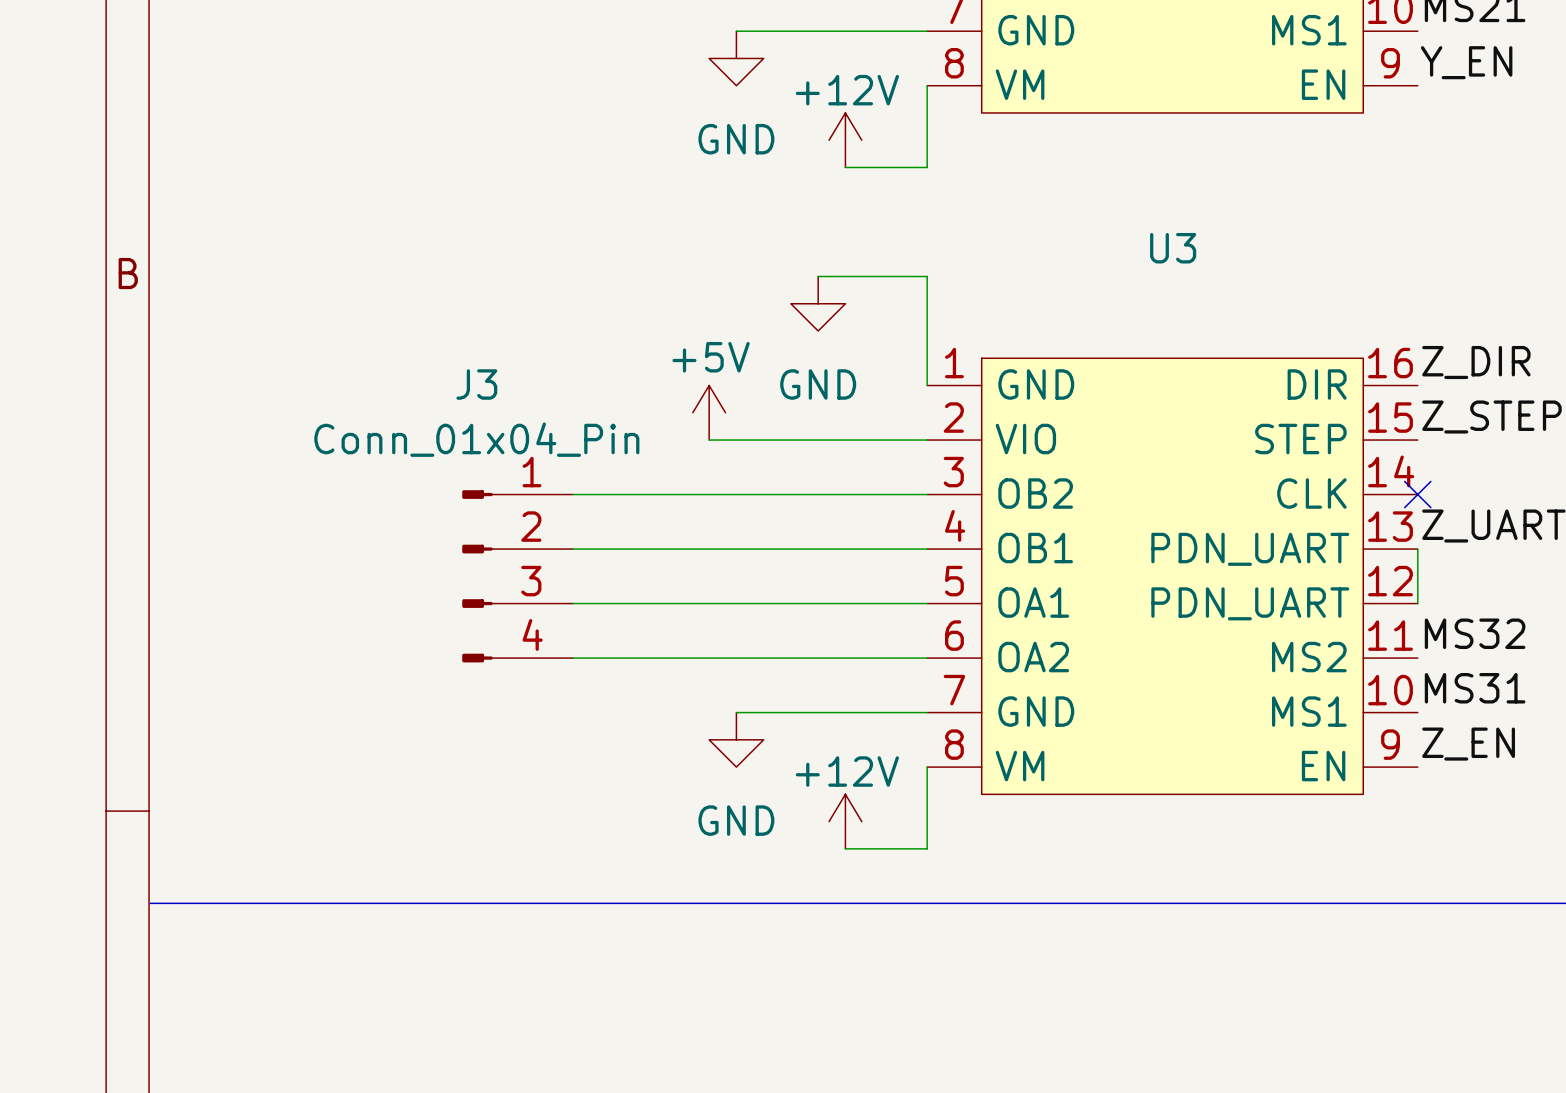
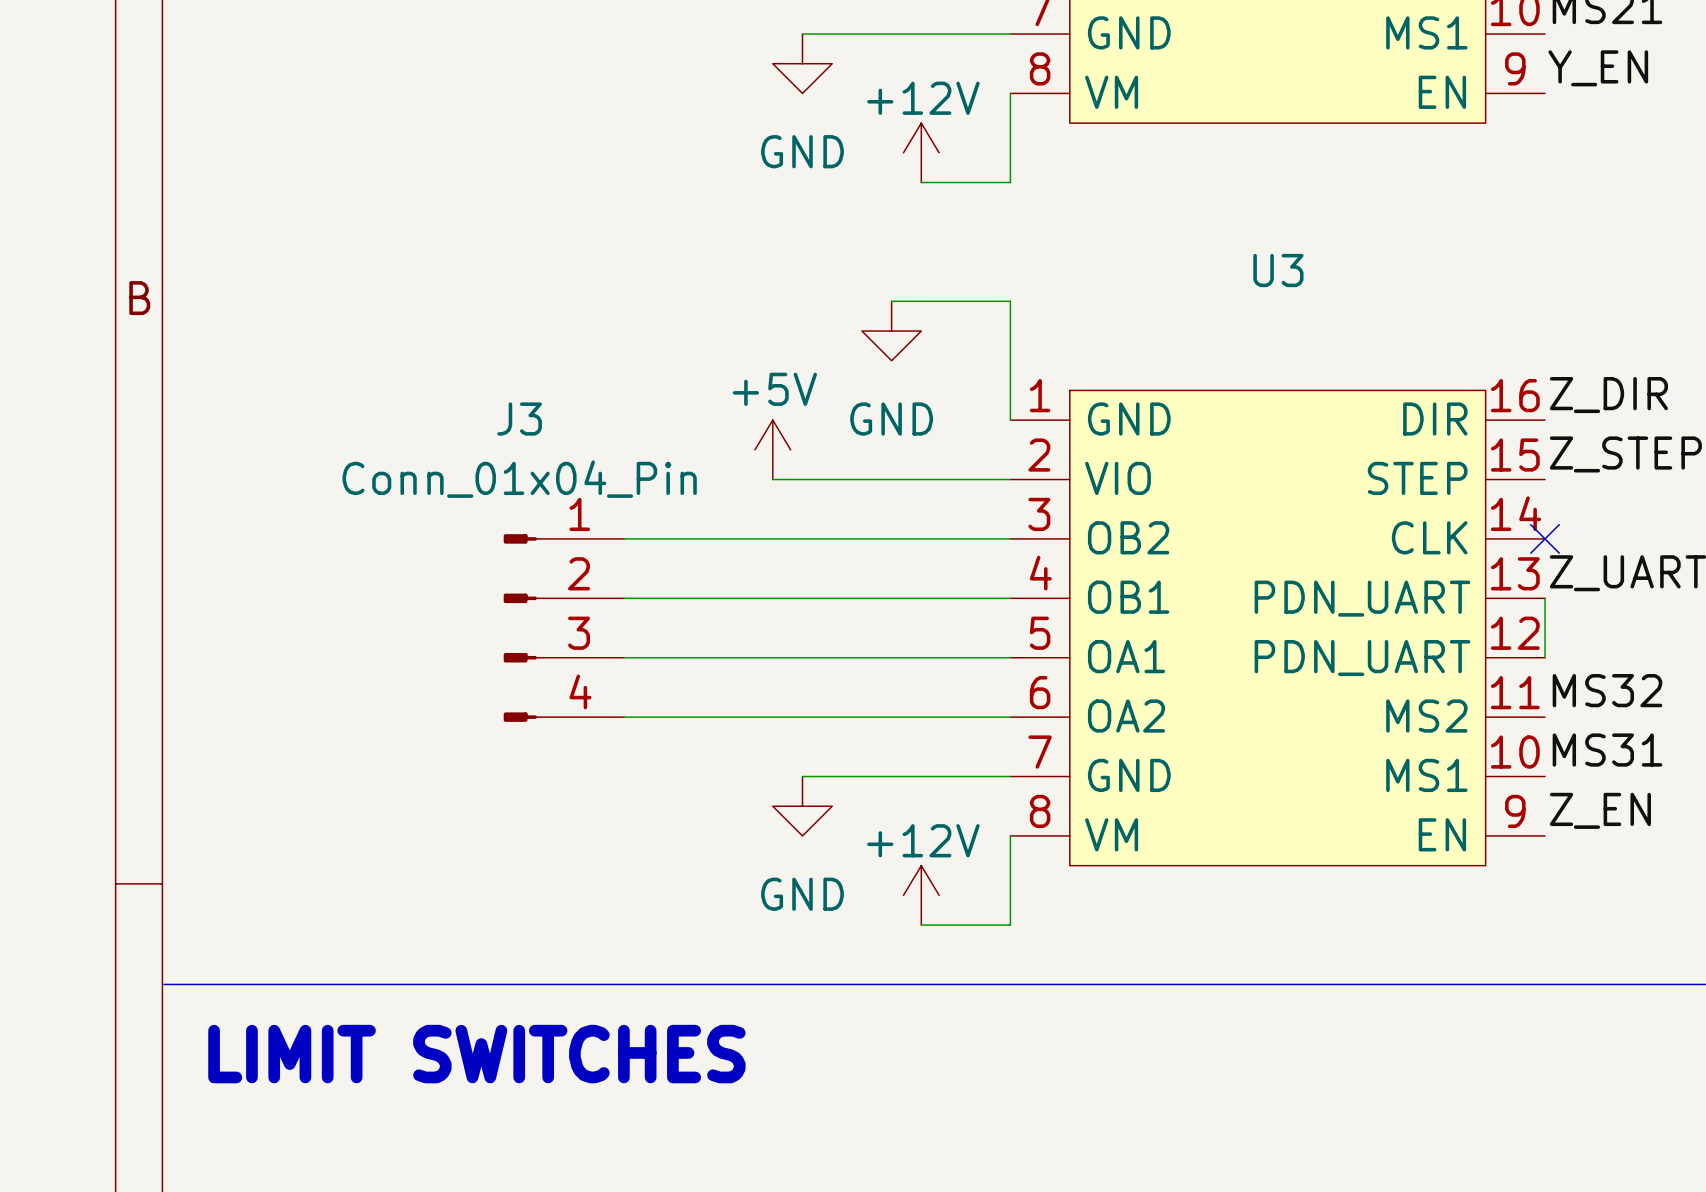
text: none -> LIMIT SWITCHES (476, 1054)

